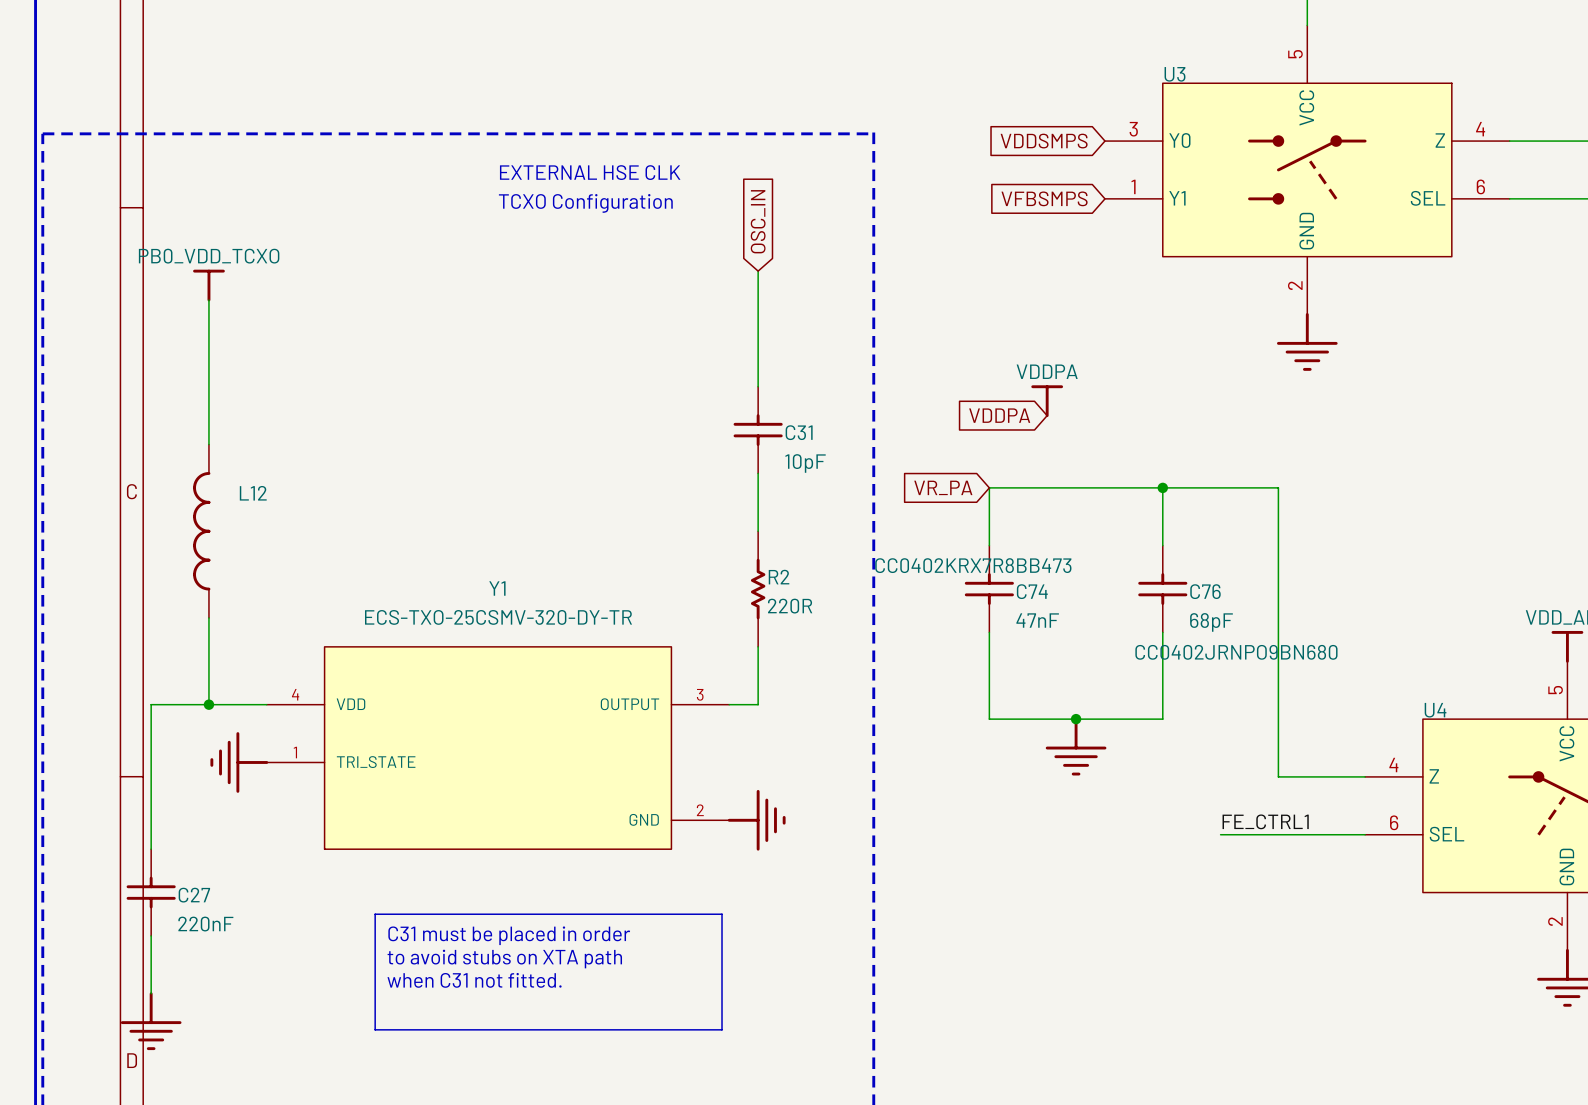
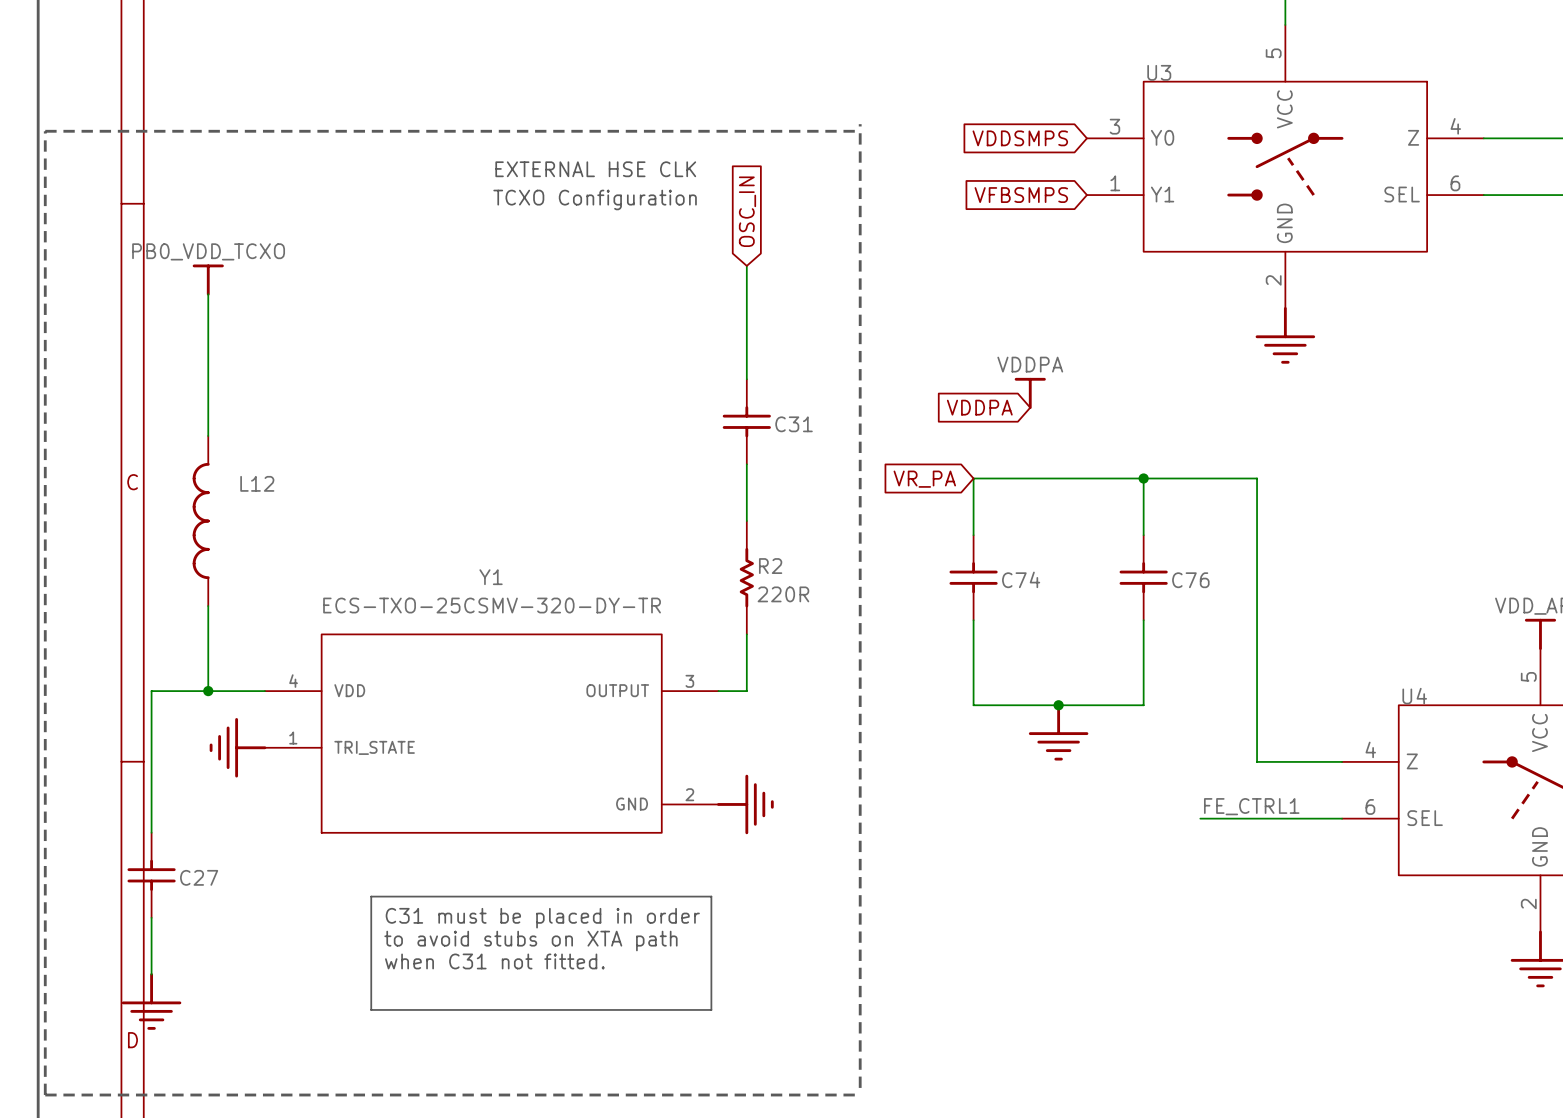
C31 text: 10pF (805, 463) -> none
C74 text: CC0402KRX7R8BB473 (973, 565) -> none
C74 text: 47nF (1037, 620) -> none
C76 text: 68pF (1211, 622) -> none
C76 text: CC0402JRNPO9BN680 (1236, 652) -> none
C27 text: 220nF (205, 924) -> none

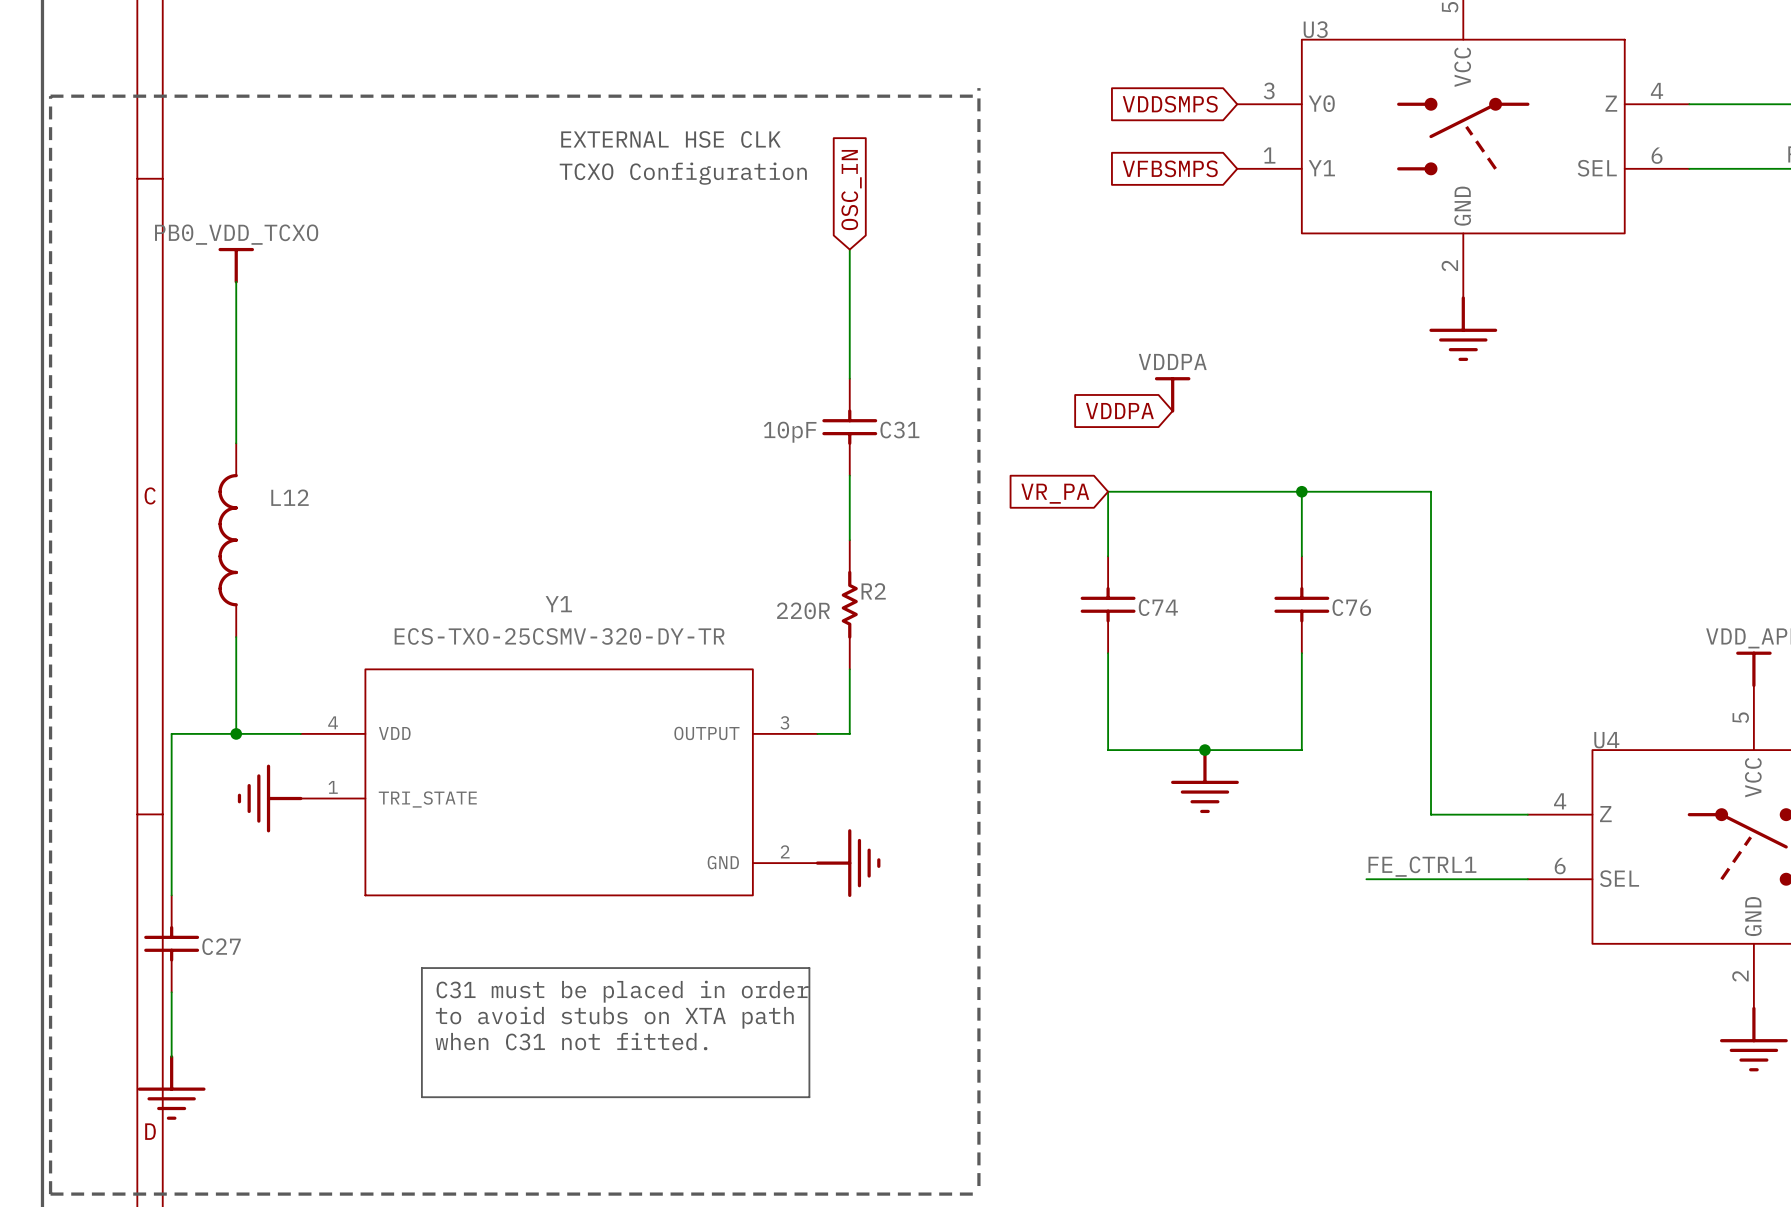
C31 value: none -> 10pF (790, 432)
R2 value: none -> 220R (803, 610)
R2 text: 220R (783, 594) -> none

